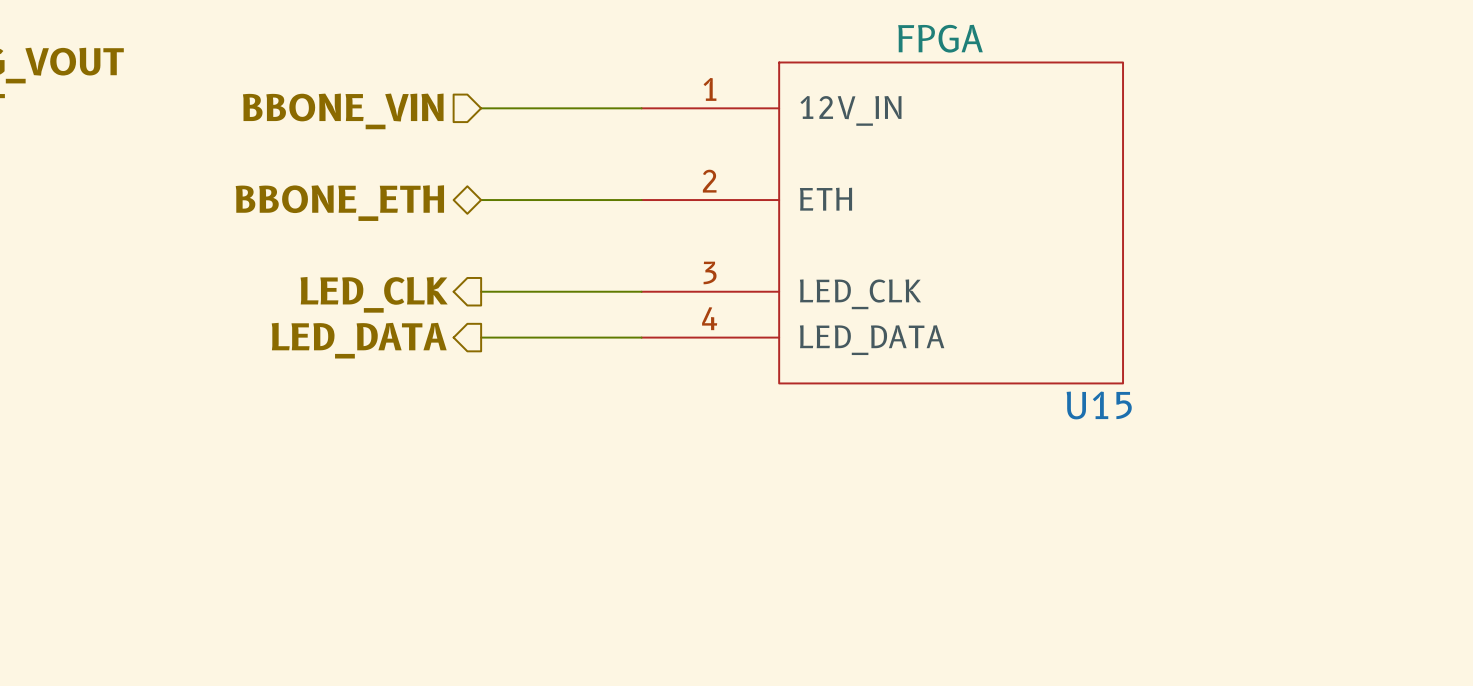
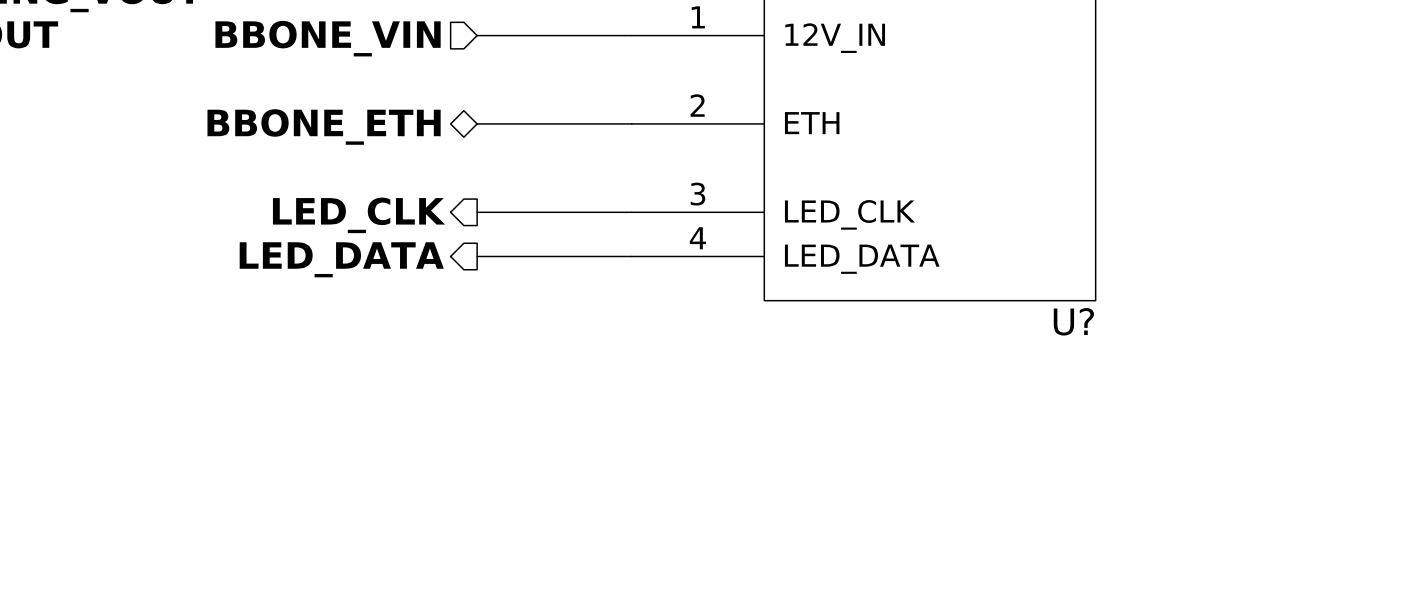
U15 name: U15 (1099, 405) -> U? (1073, 321)

